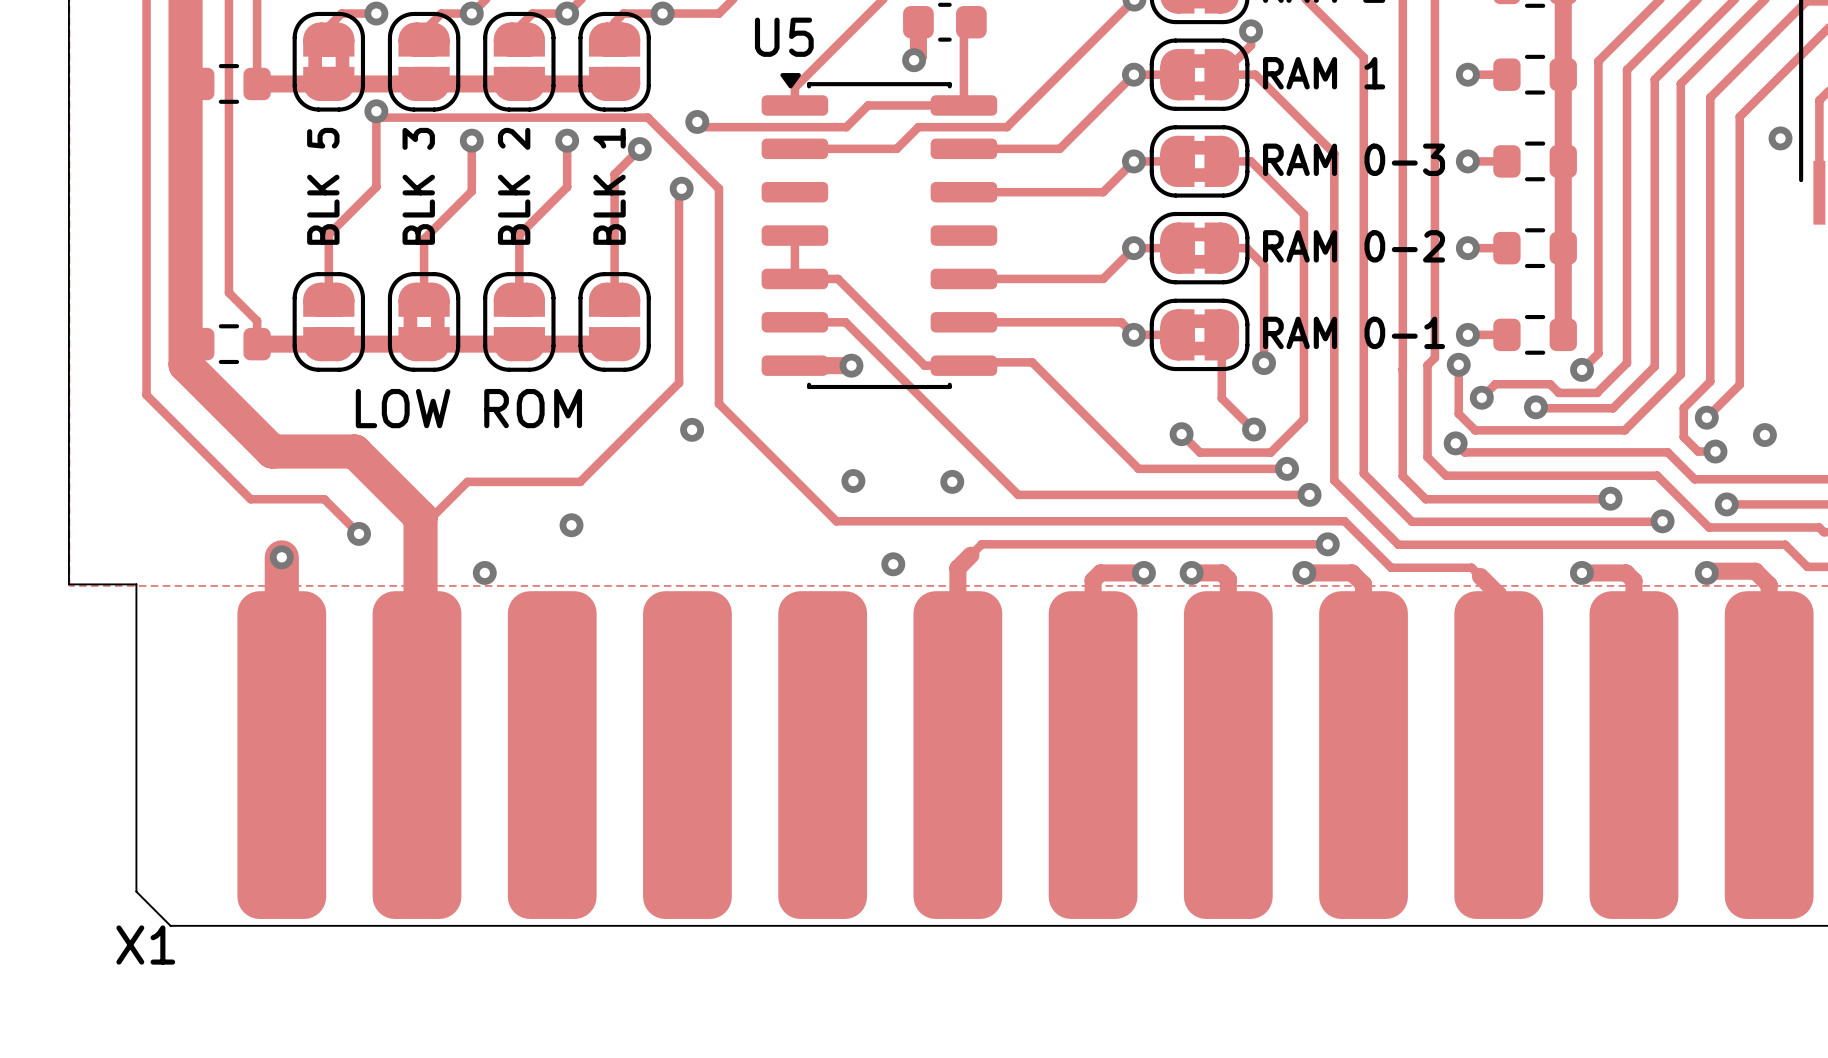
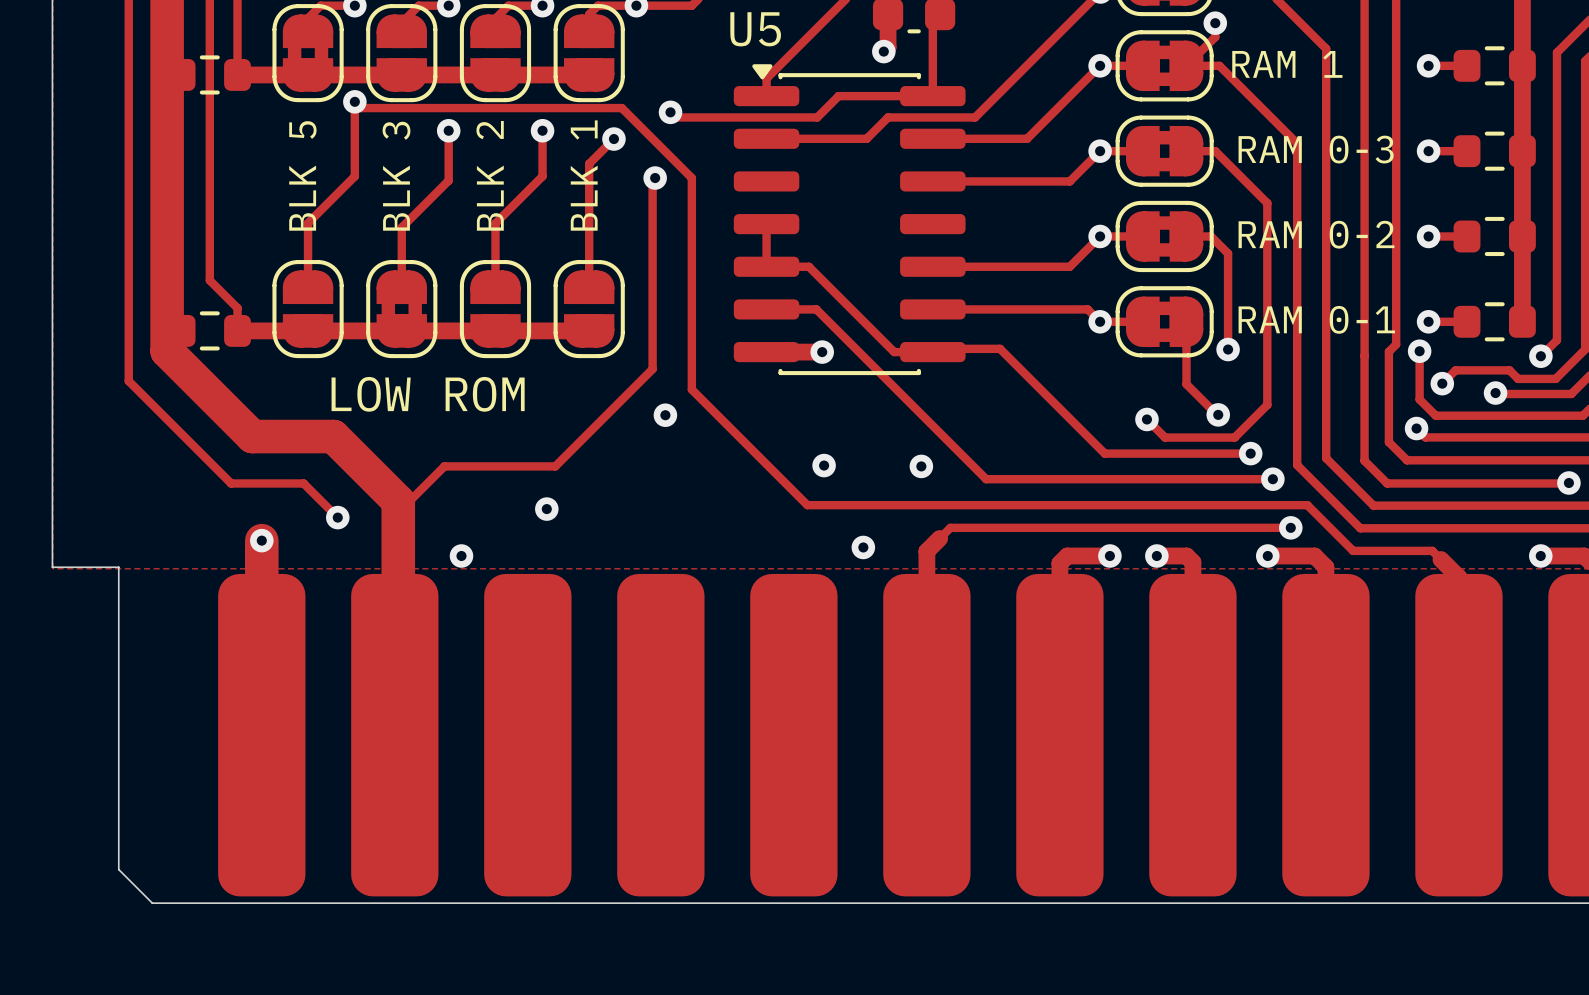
X1 name: X1 (145, 945) -> none

